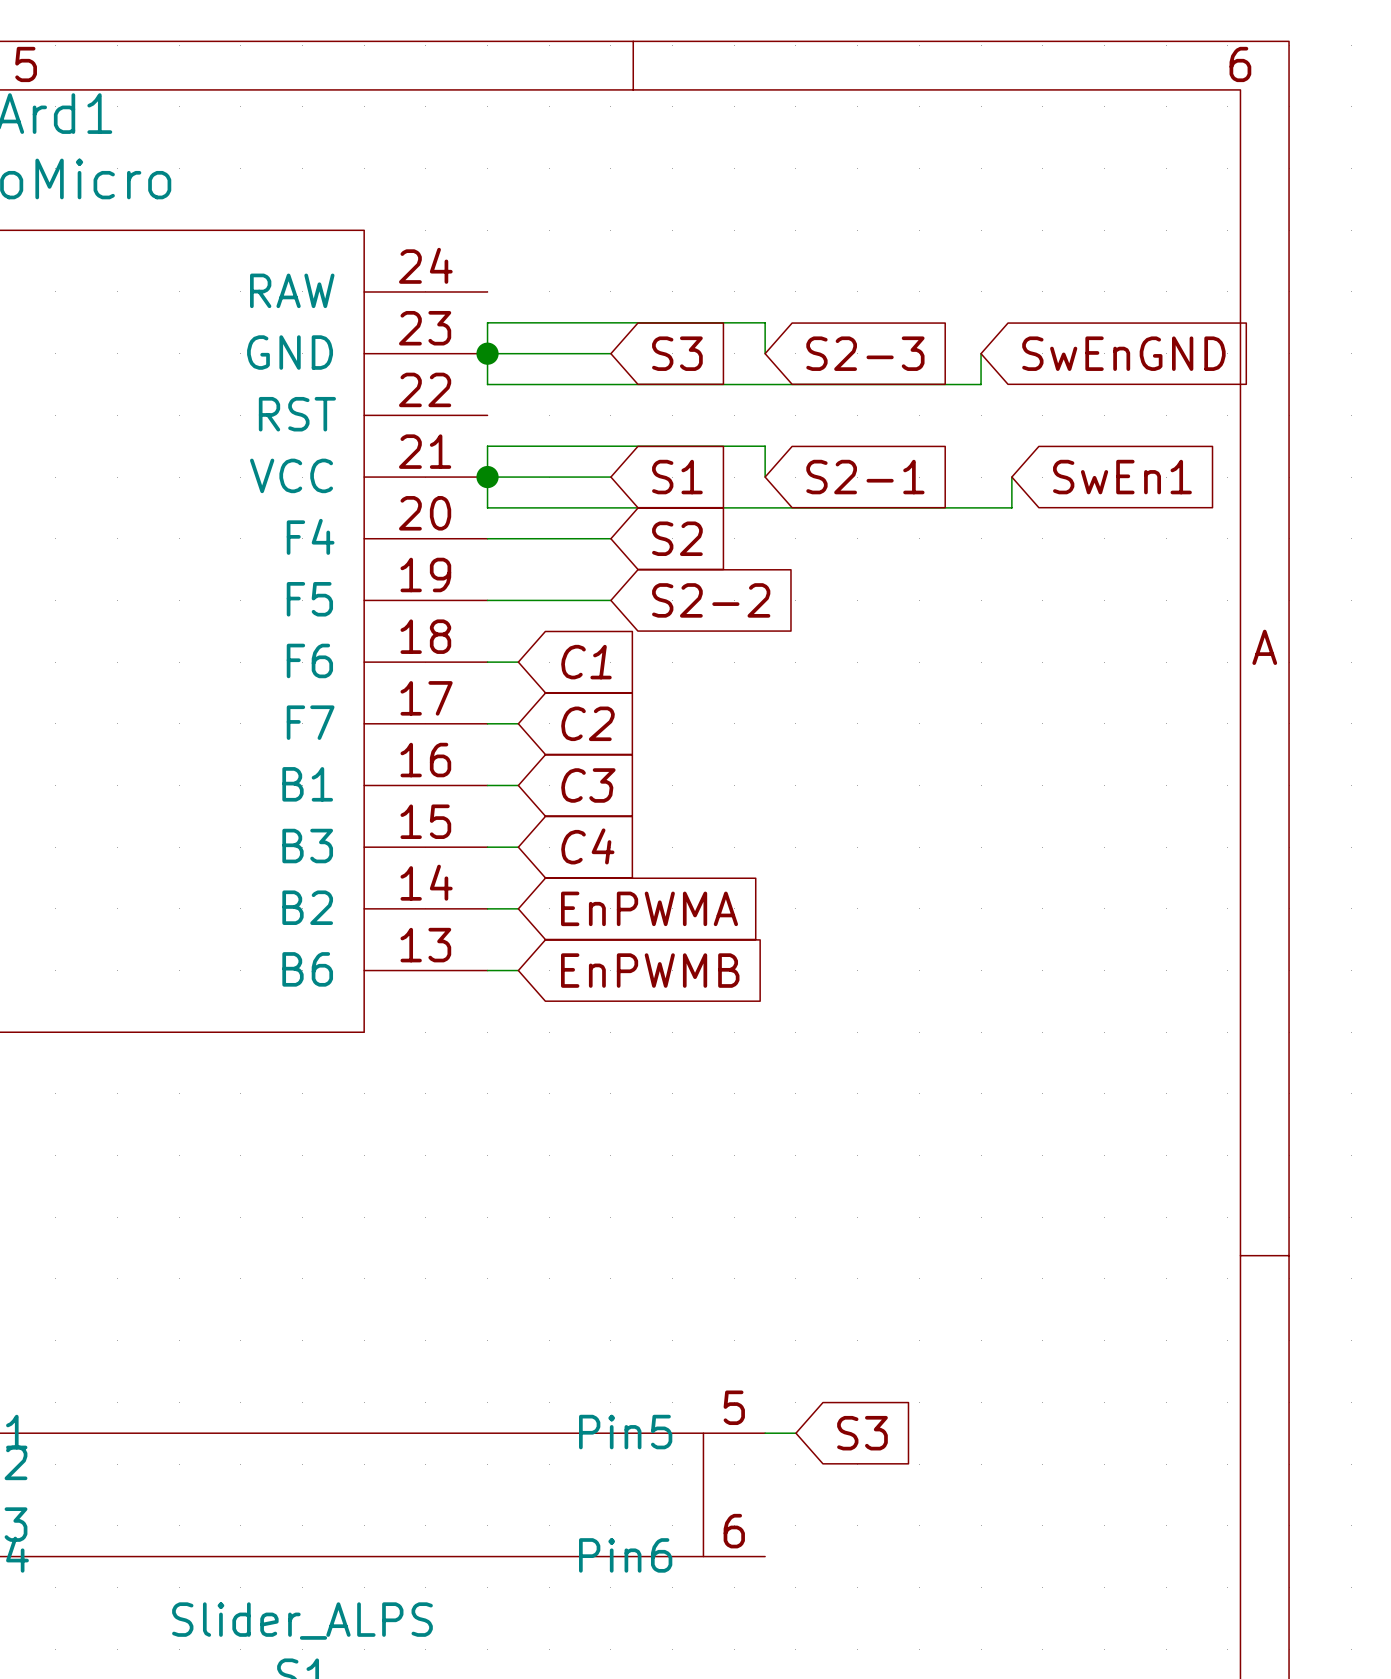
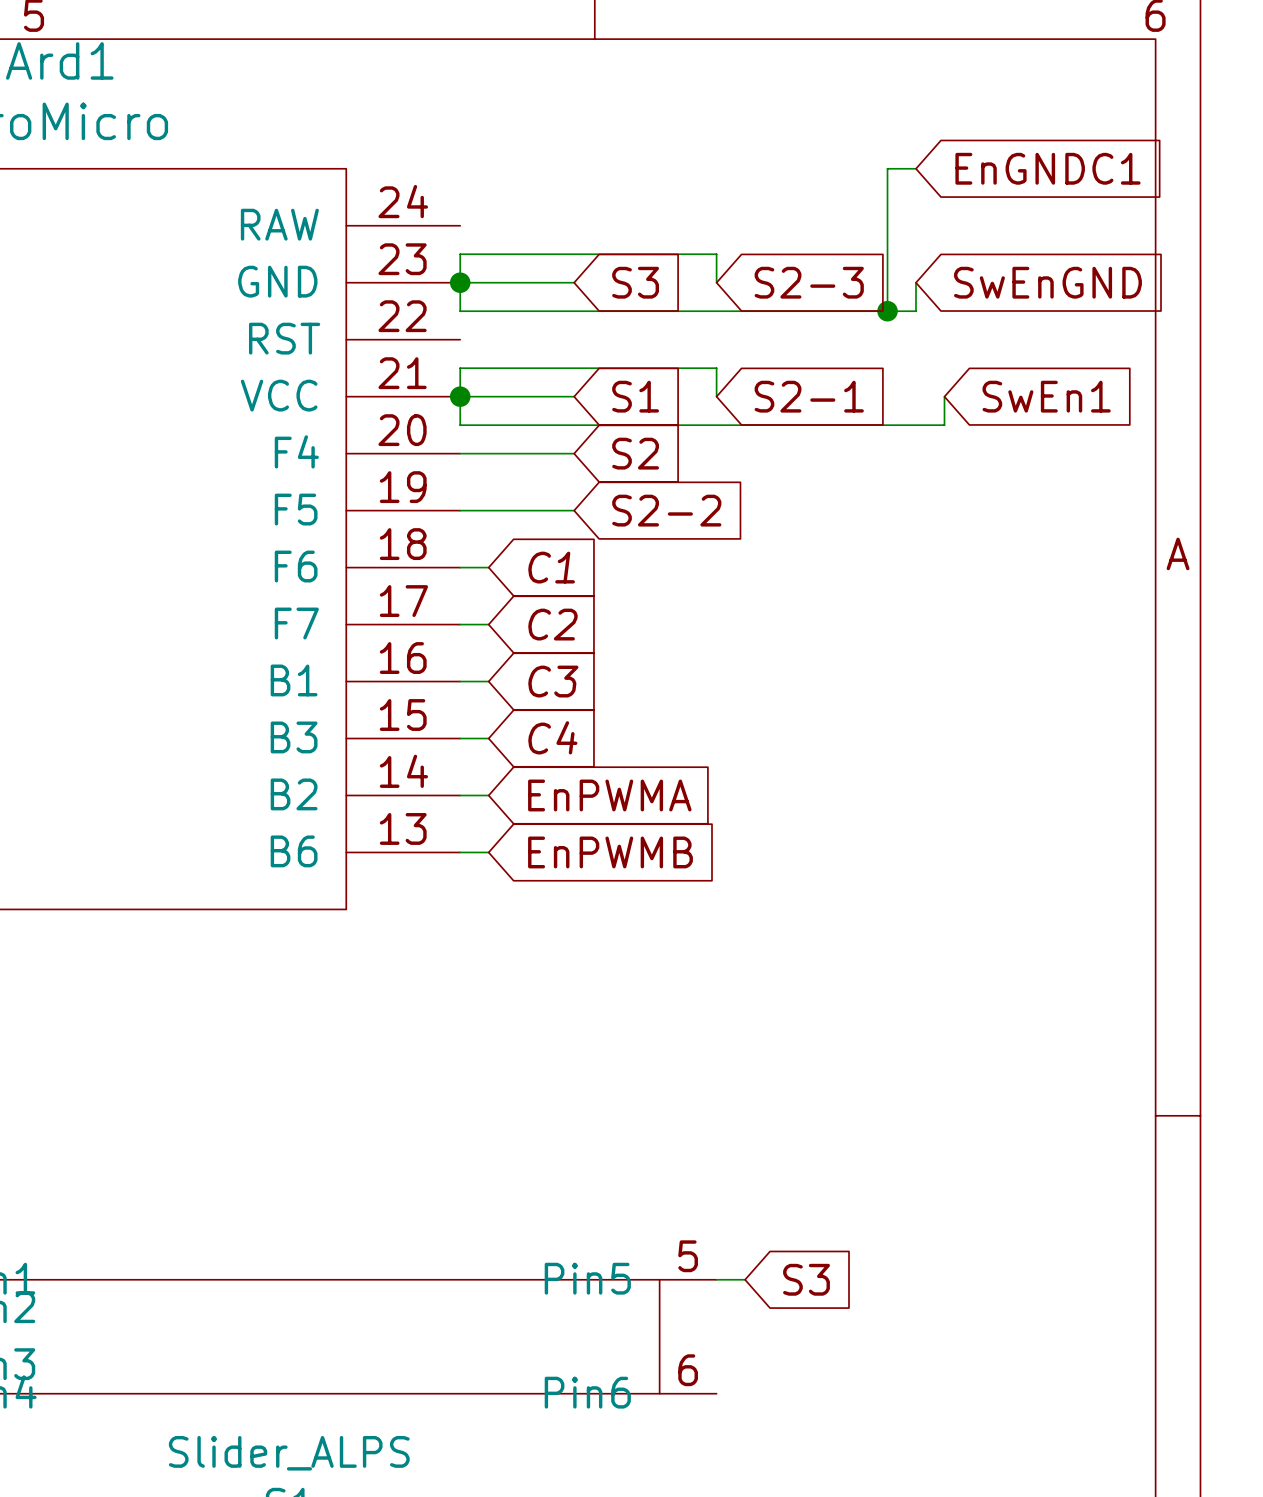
wire: none -> (916, 168) (887, 168) (887, 311)
global label: none -> EnGNDC1 (1047, 168)
junction: none -> (887, 311)

